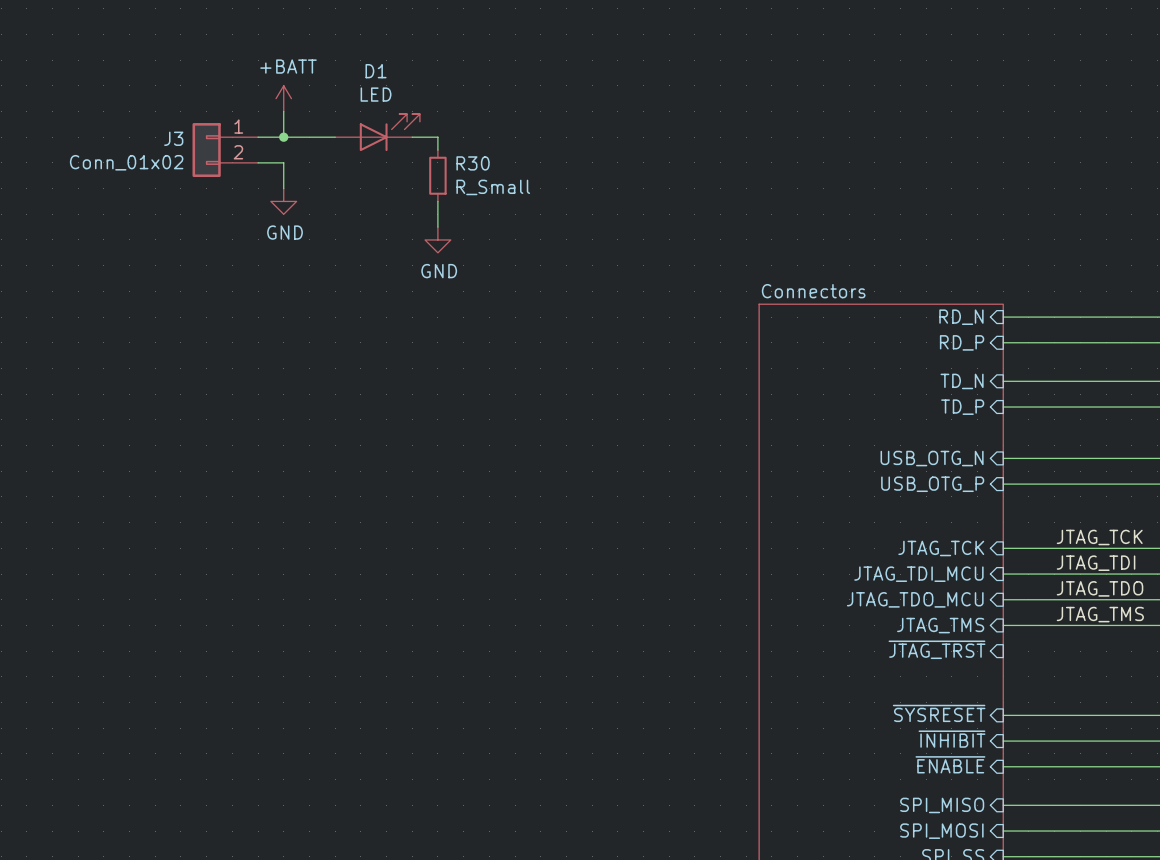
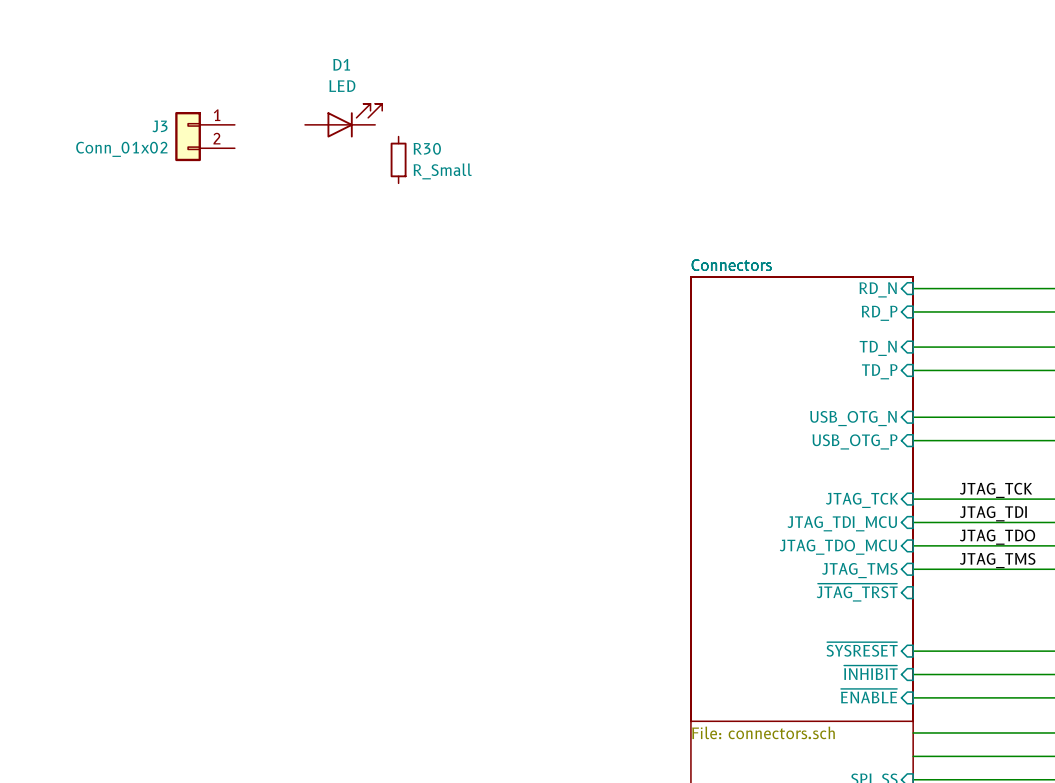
power symbol: +BATT (283, 98) -> none
wire: (283, 111) (283, 137) -> none
wire: (258, 137) (335, 137) -> none
junction: (283, 137) -> none
wire: (412, 137) (437, 137) (437, 150) -> none
wire: (258, 162) (283, 162) (283, 188) -> none
power symbol: GND (283, 201) -> none
wire: (437, 201) (437, 227) -> none
power symbol: GND (437, 239) -> none
sheet Connectors: none -> File: connectors.sch (802, 499)
sheet pin: SPI_MISO (942, 805) -> none
sheet pin: SPI_MOSI (941, 831) -> none

